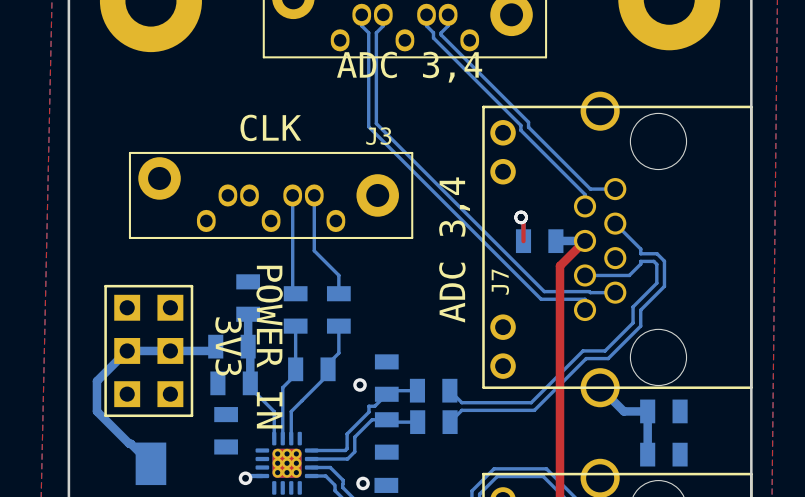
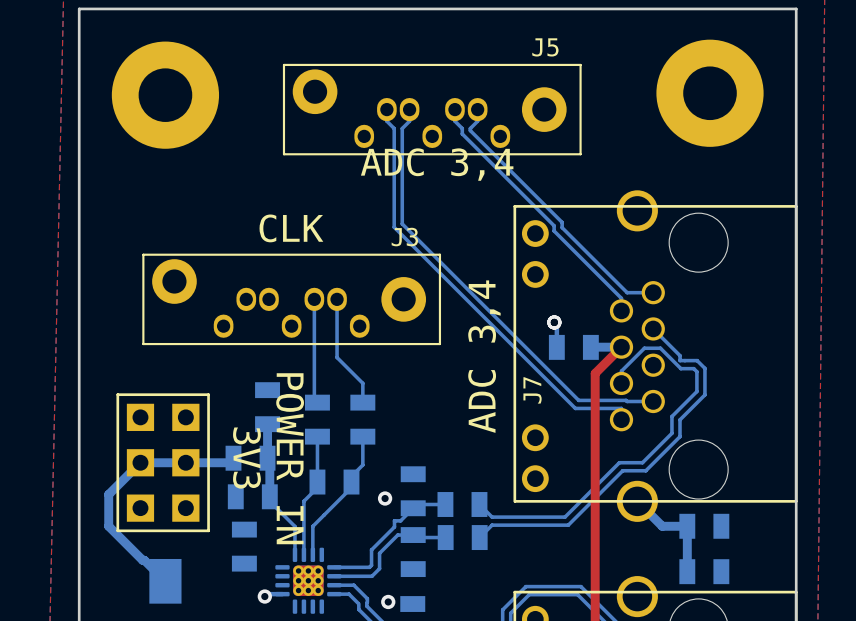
top track: (523, 219) (523, 241) -> none
bottom track: (641, 261) (629, 275) (585, 275) -> (680, 368) (660, 348) (644, 348) (621, 371) (621, 383)

